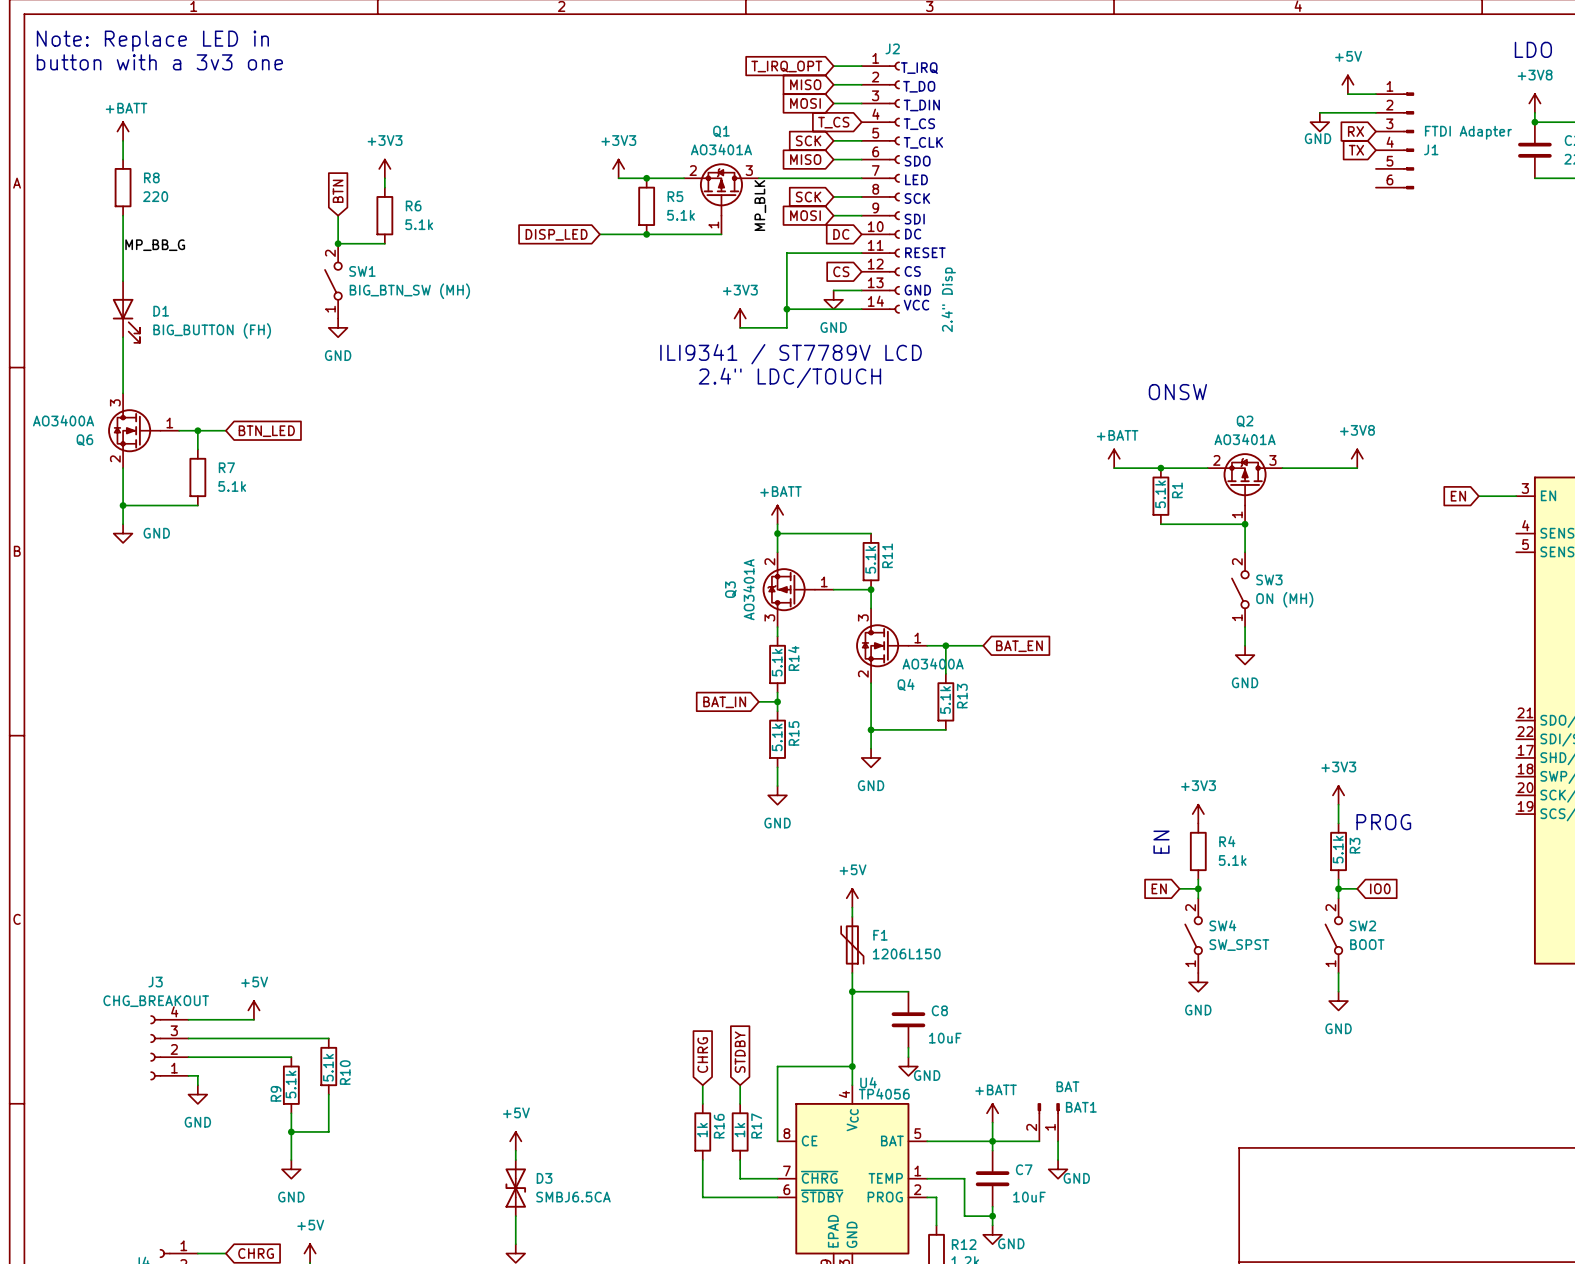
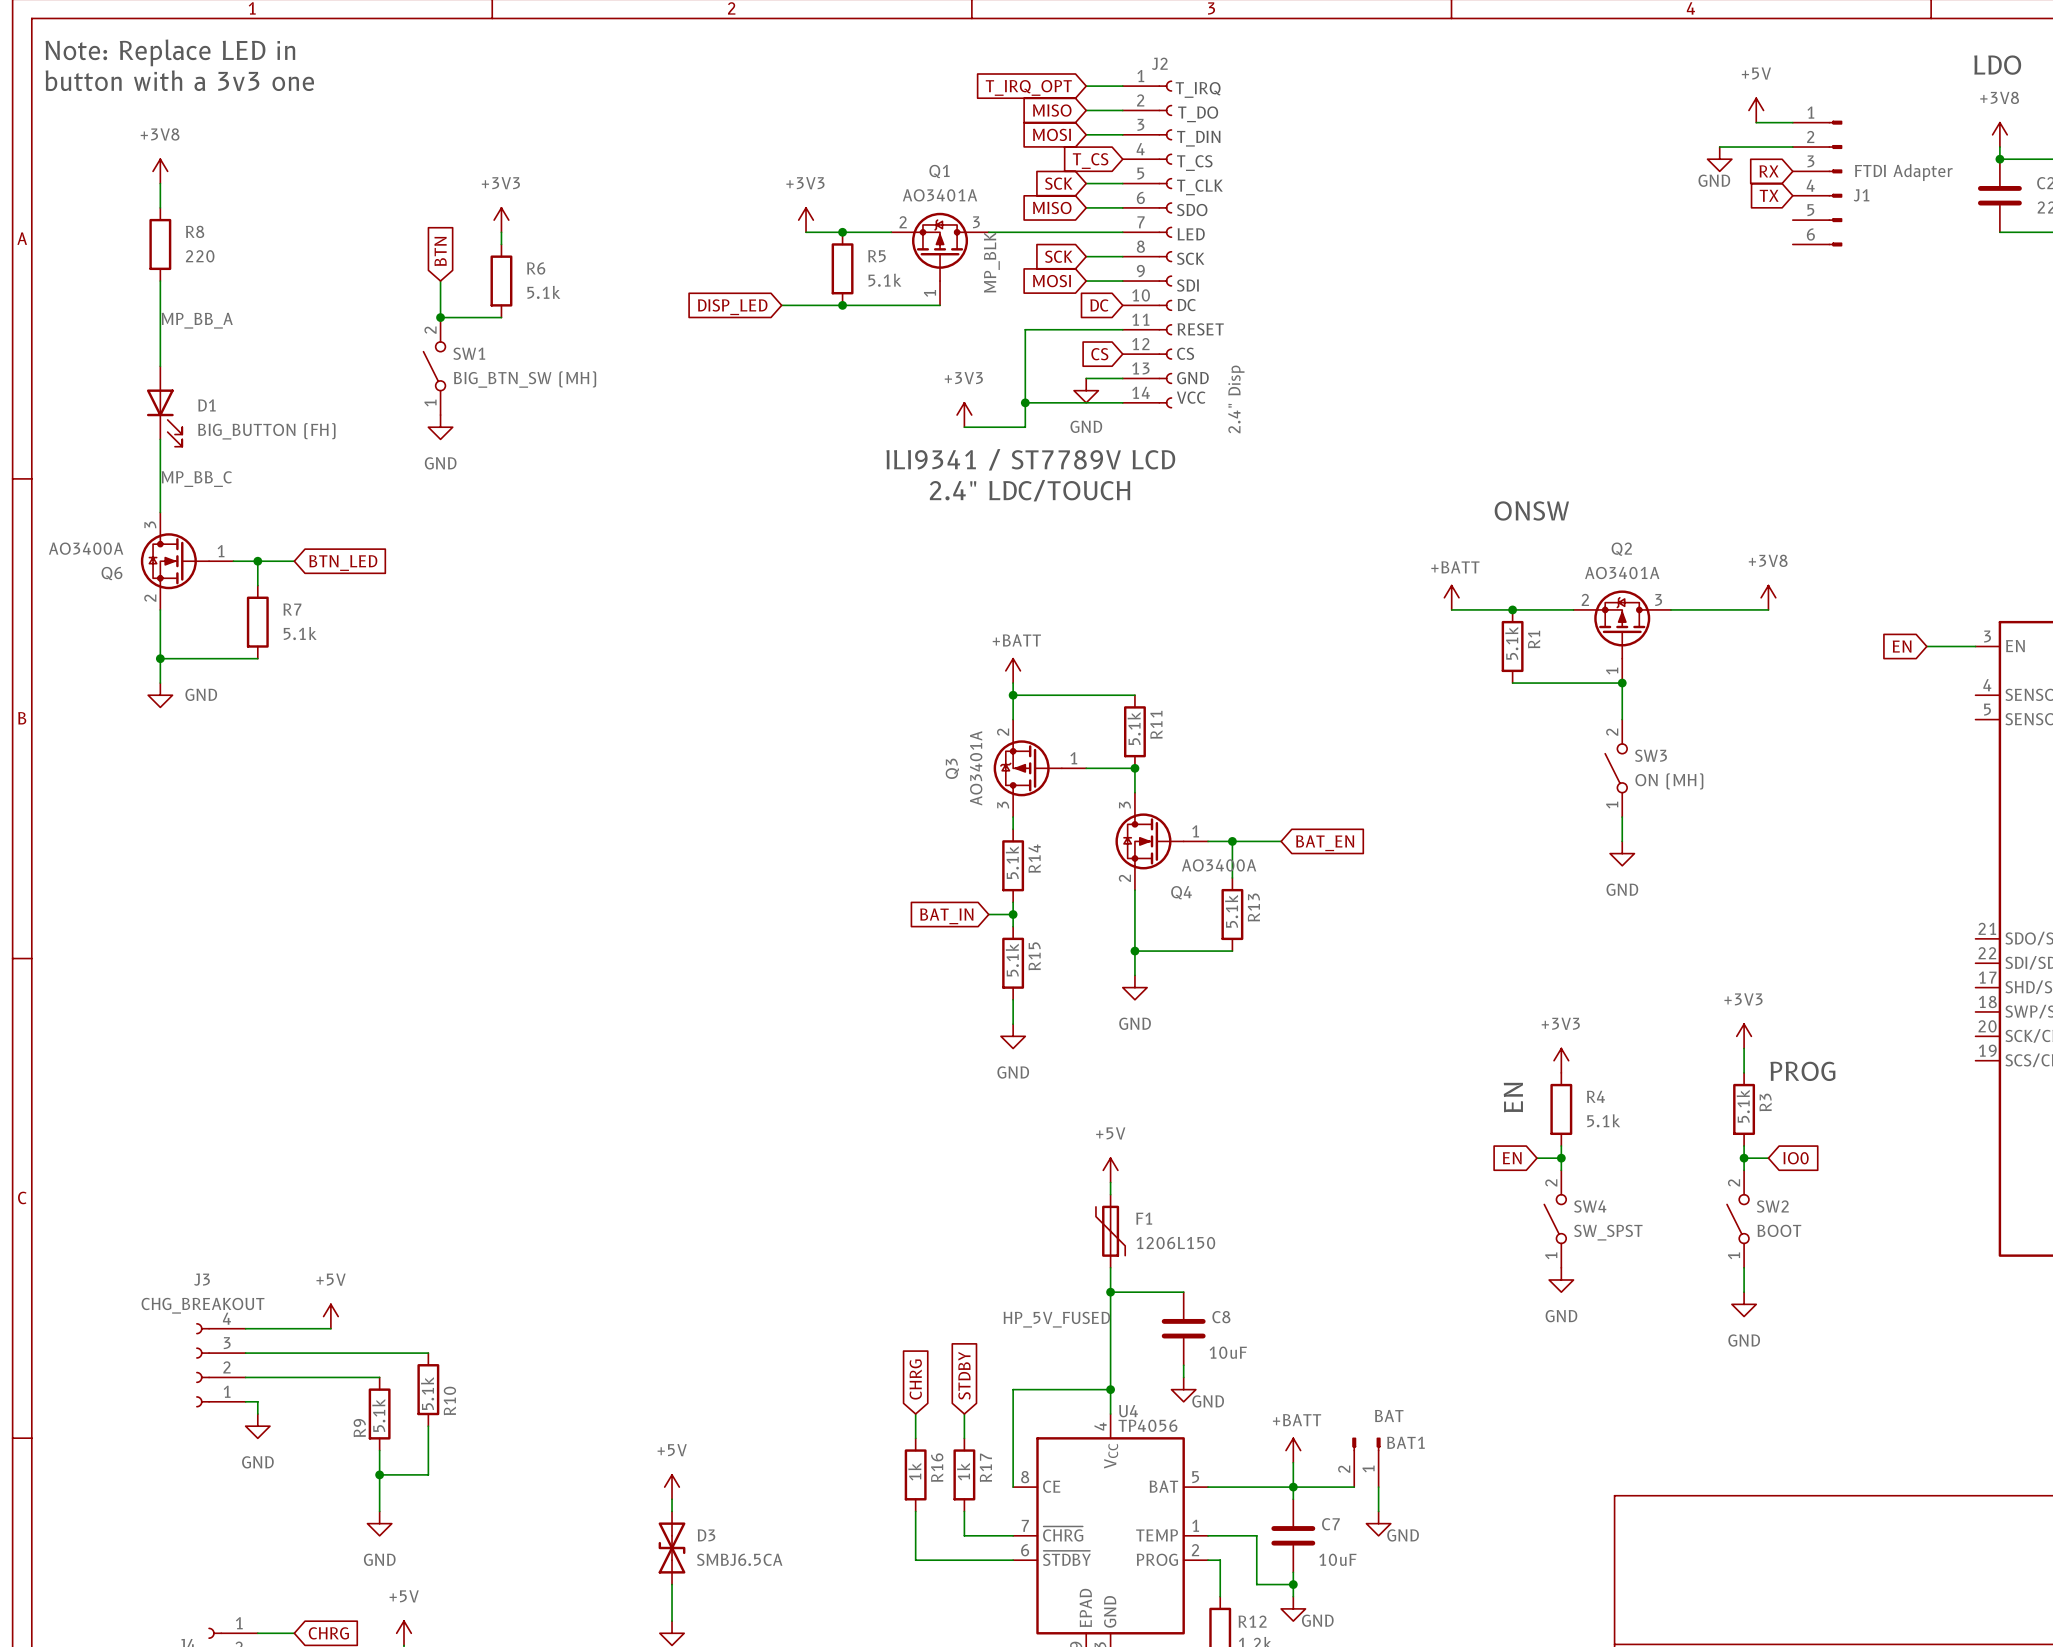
power symbol: +BATT (123, 131) -> +3V8 (160, 171)
label: MP_BB_G (155, 245) -> MP_BB_A (197, 320)
label: none -> MP_BB_C (196, 479)
label: none -> HP_5V_FUSED (1056, 1319)

